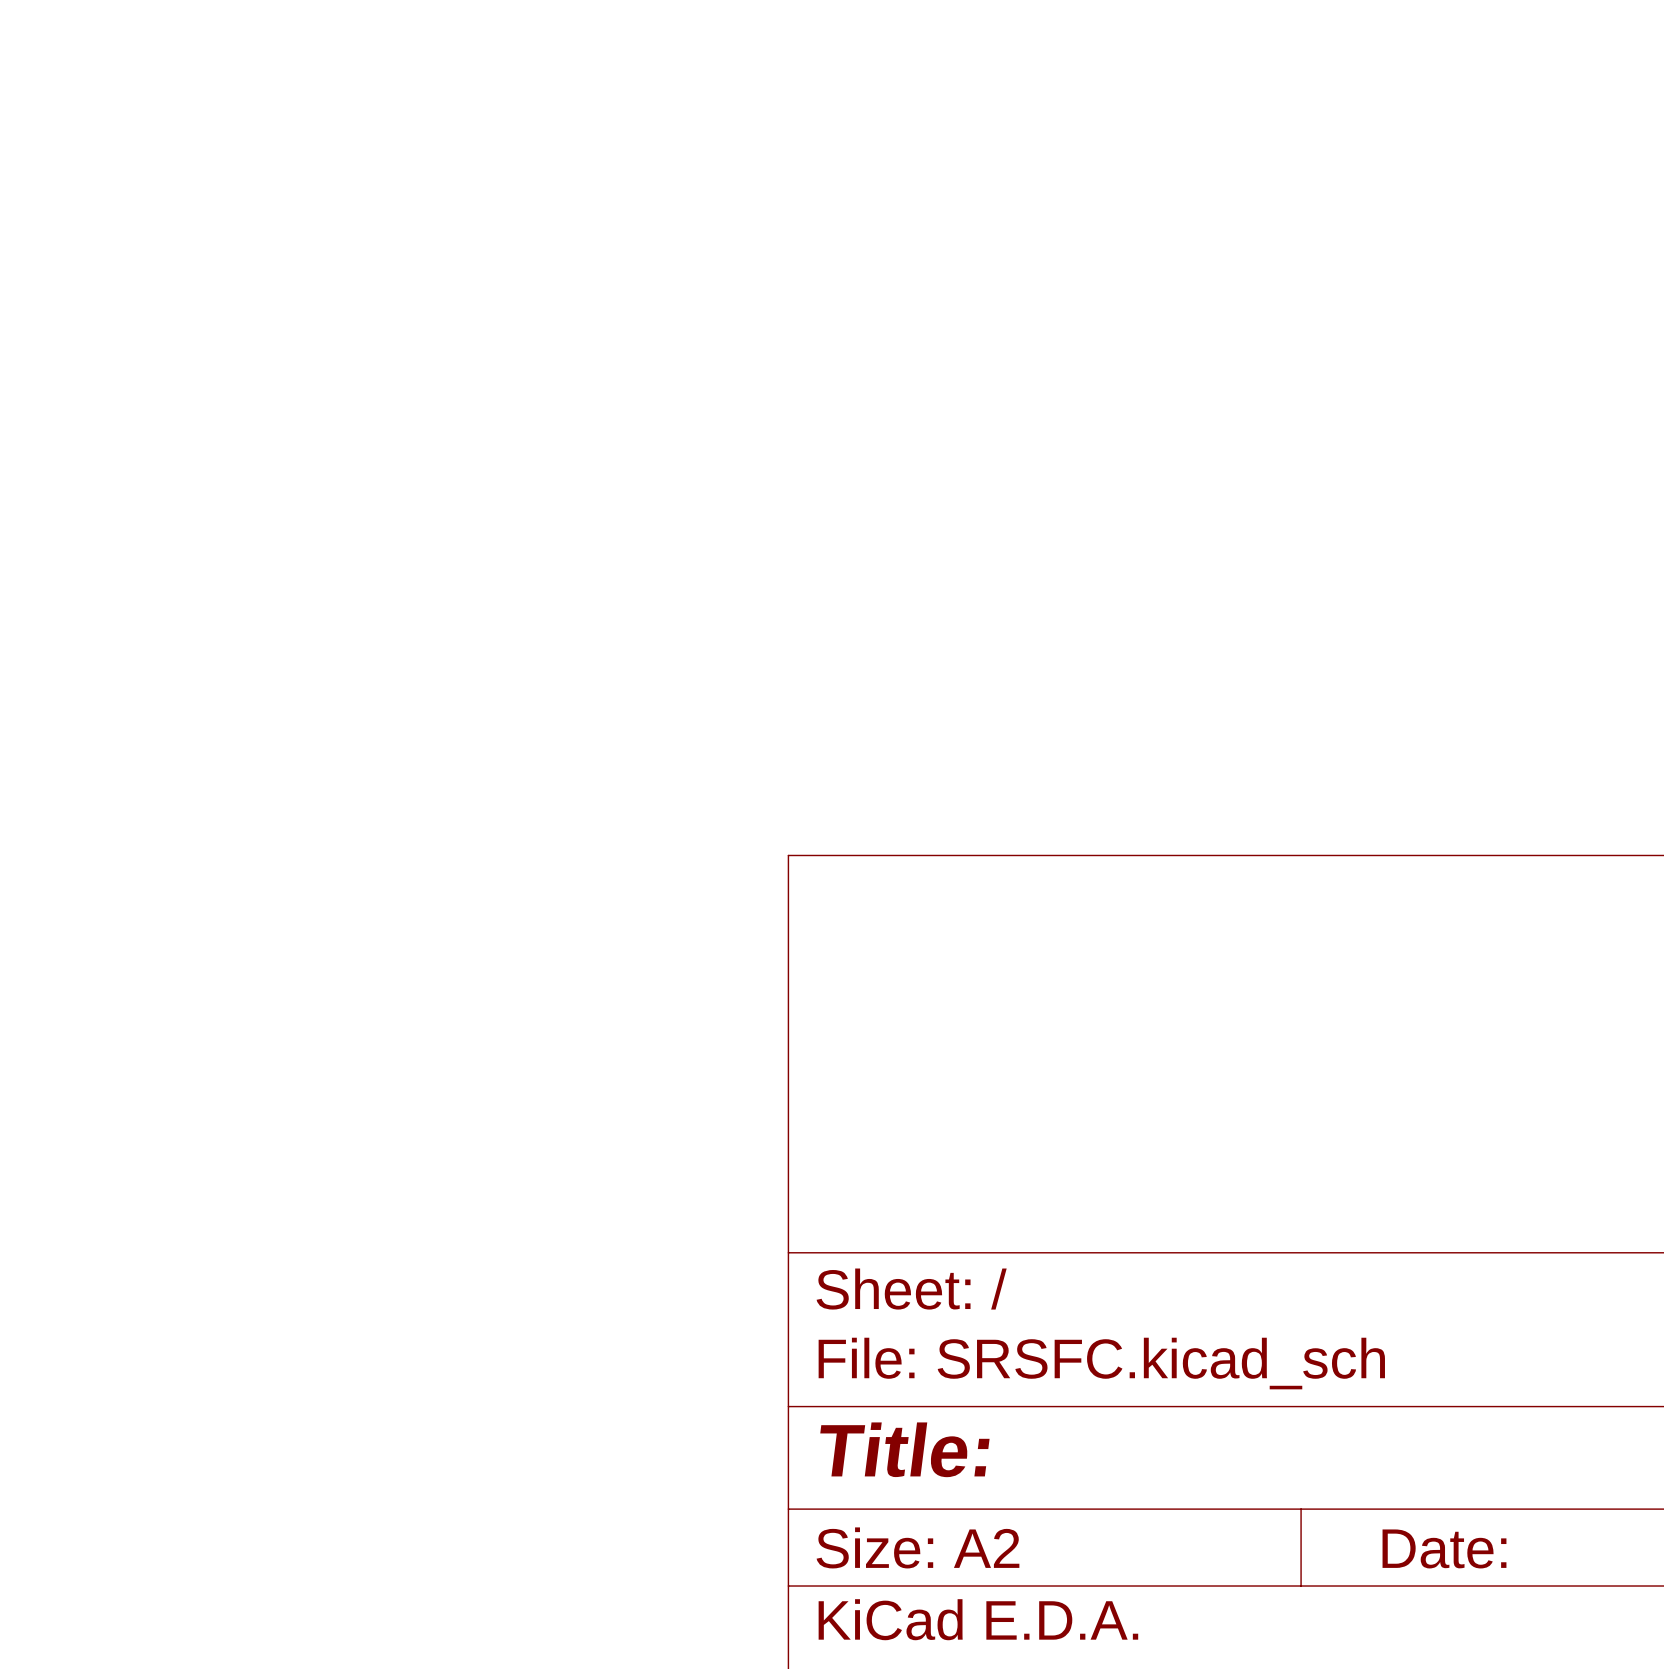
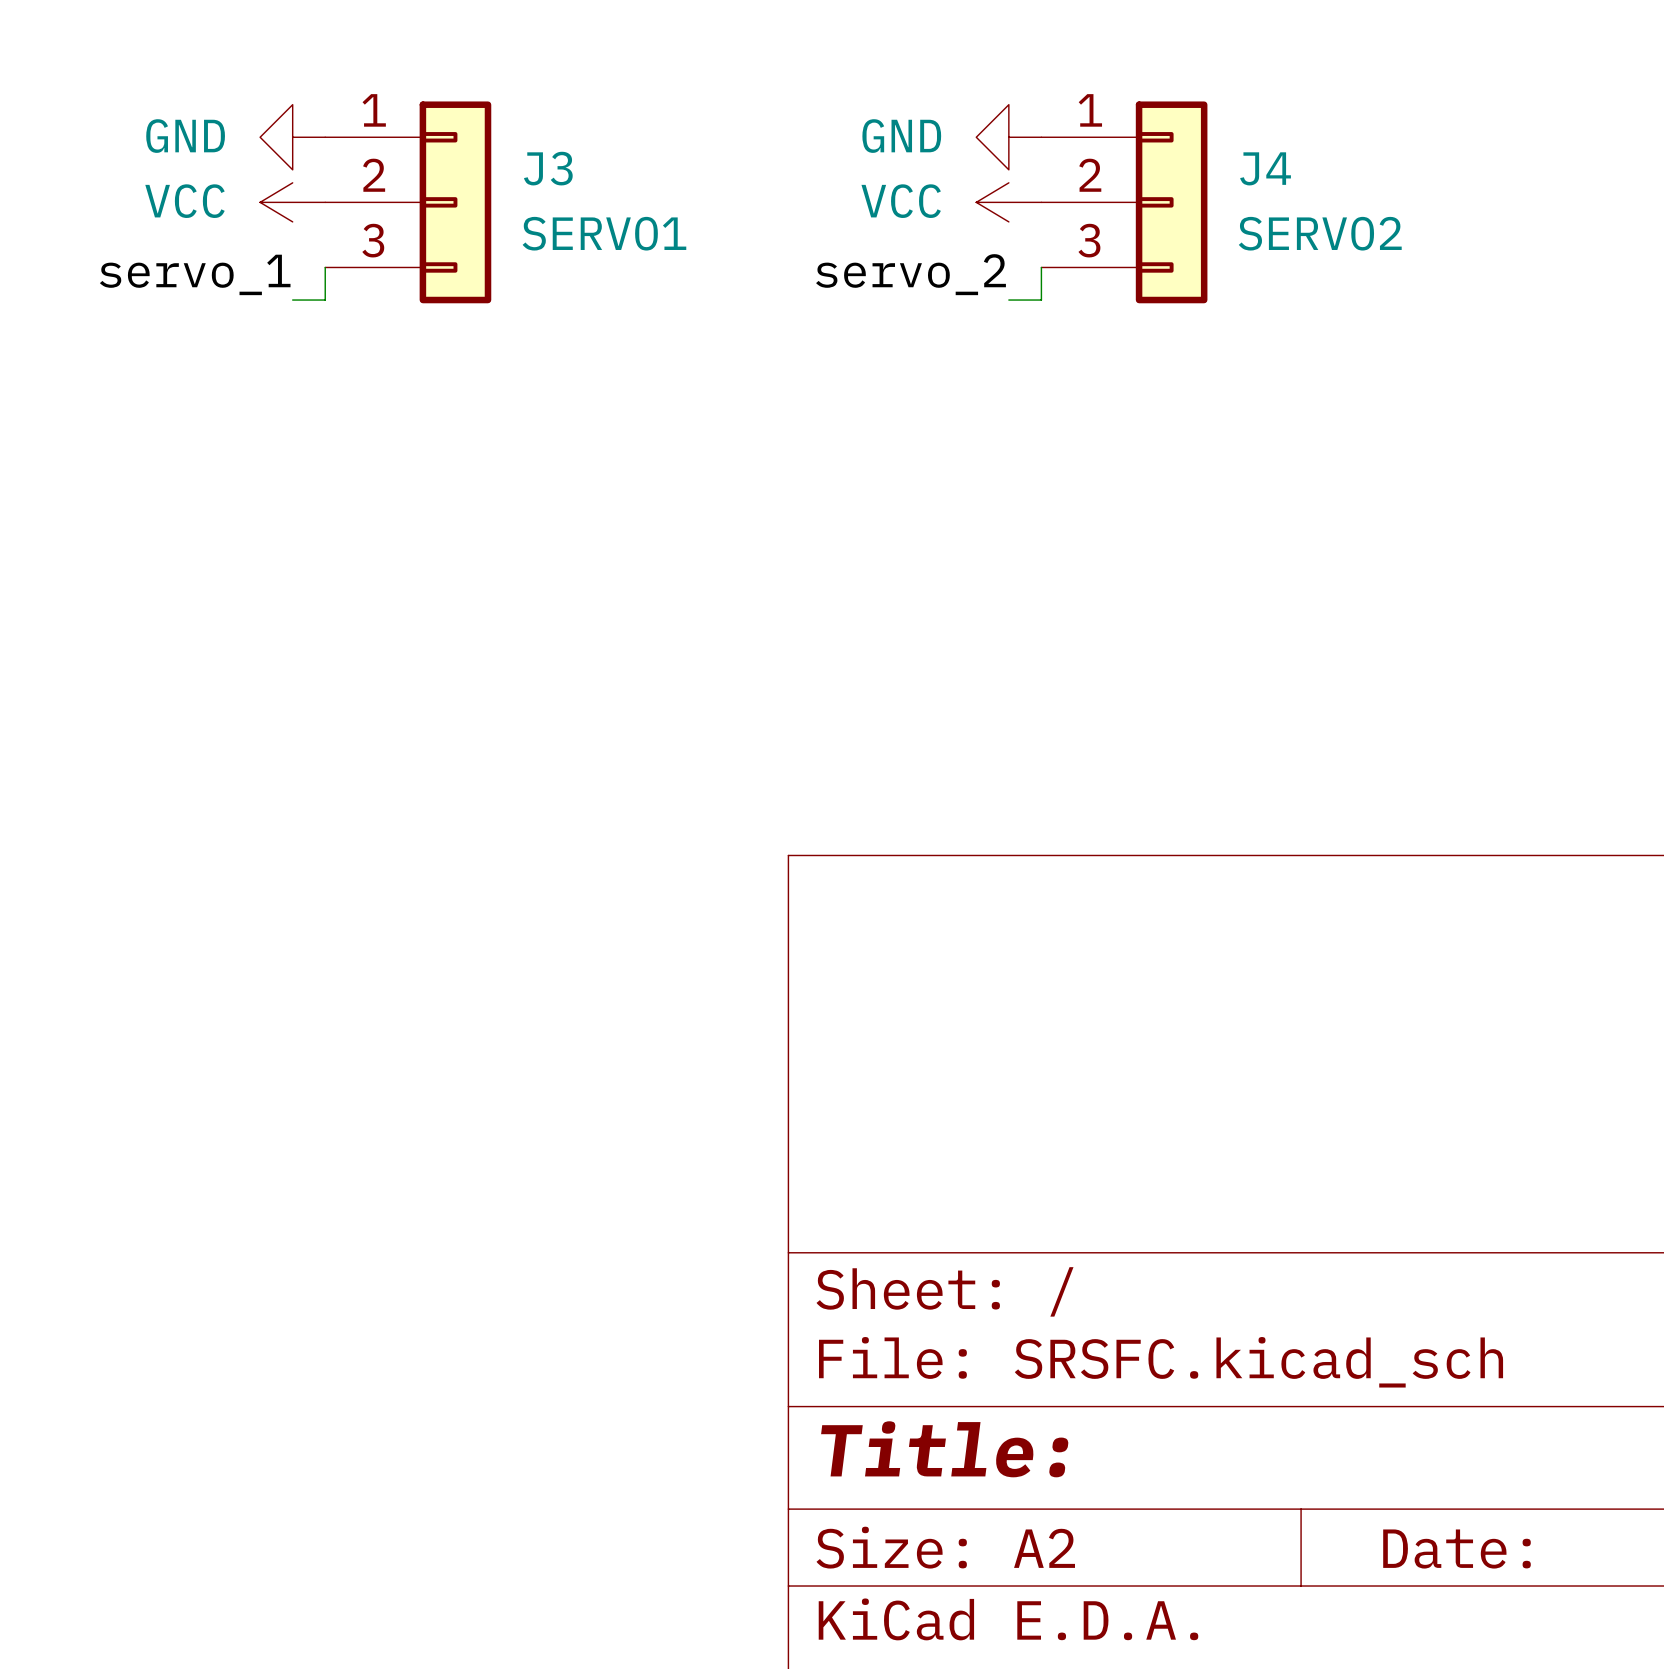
power symbol: none -> GND (292, 137)
power symbol: none -> GND (1008, 137)
power symbol: none -> VCC (292, 202)
J3: none -> SERVO1 (408, 202)
power symbol: none -> VCC (1008, 202)
J4: none -> SERVO2 (1124, 202)
wire: none -> (325, 267) (325, 300) (292, 300)
wire: none -> (1041, 267) (1041, 300) (1008, 300)
label: none -> servo_1 (195, 274)
label: none -> servo_2 (911, 274)

